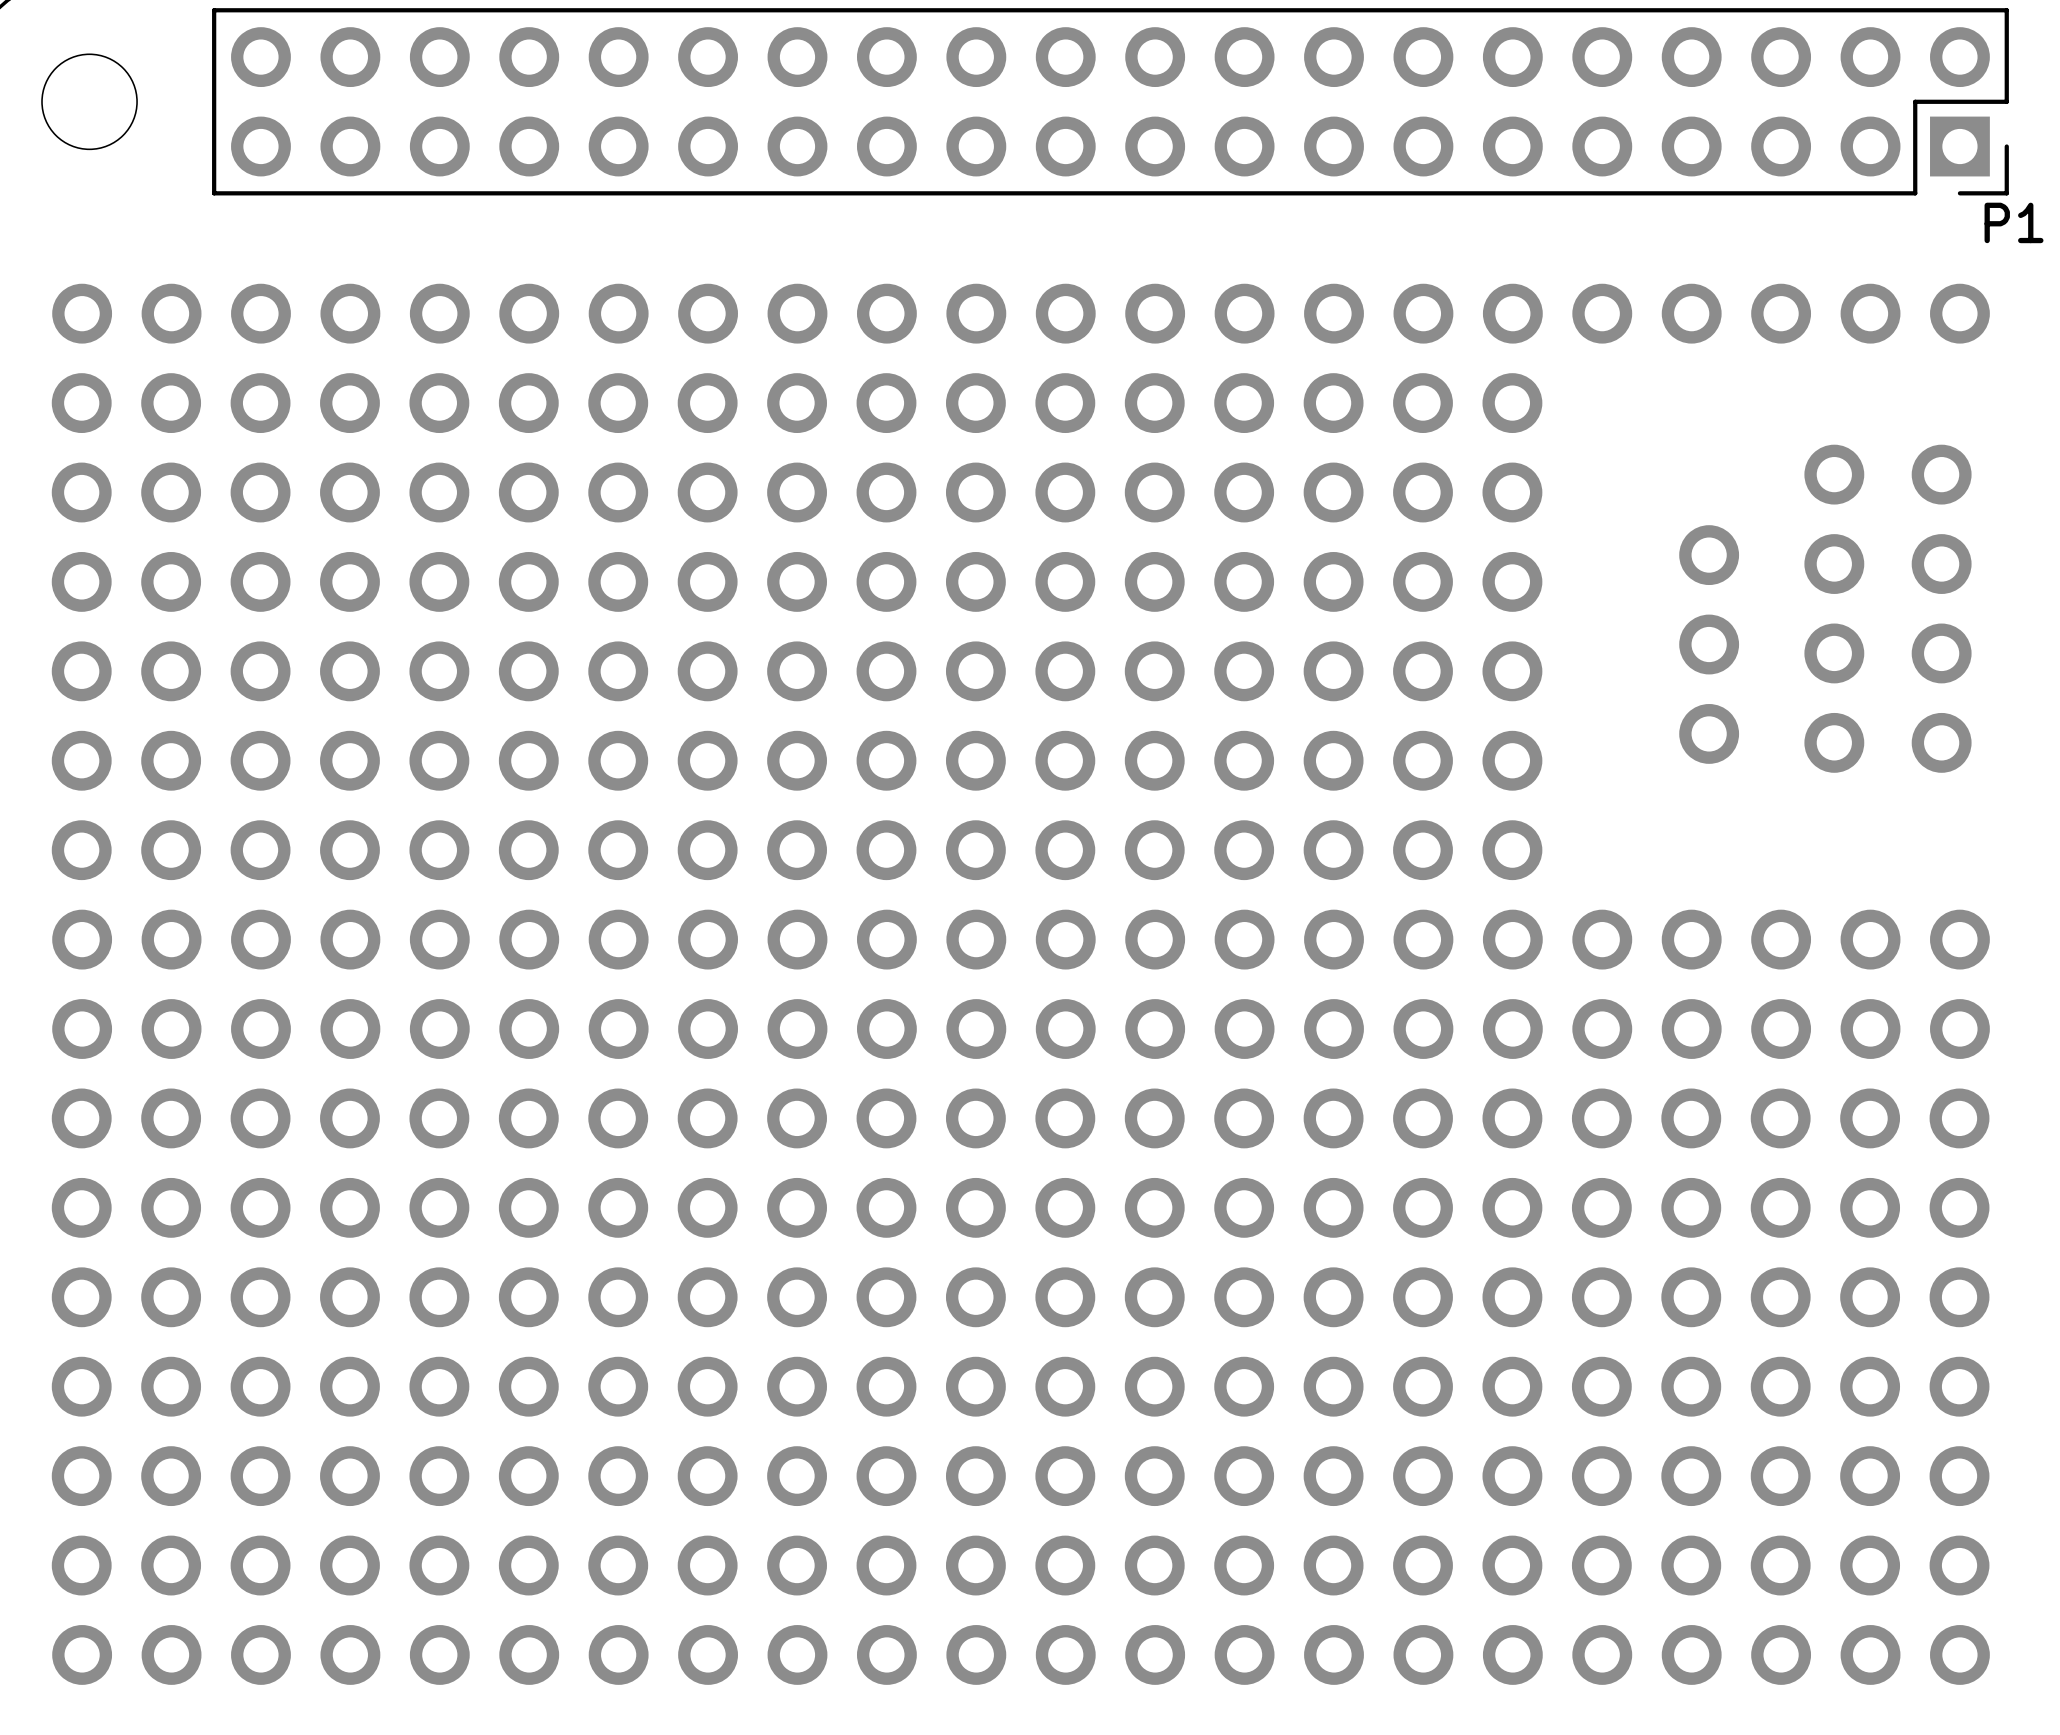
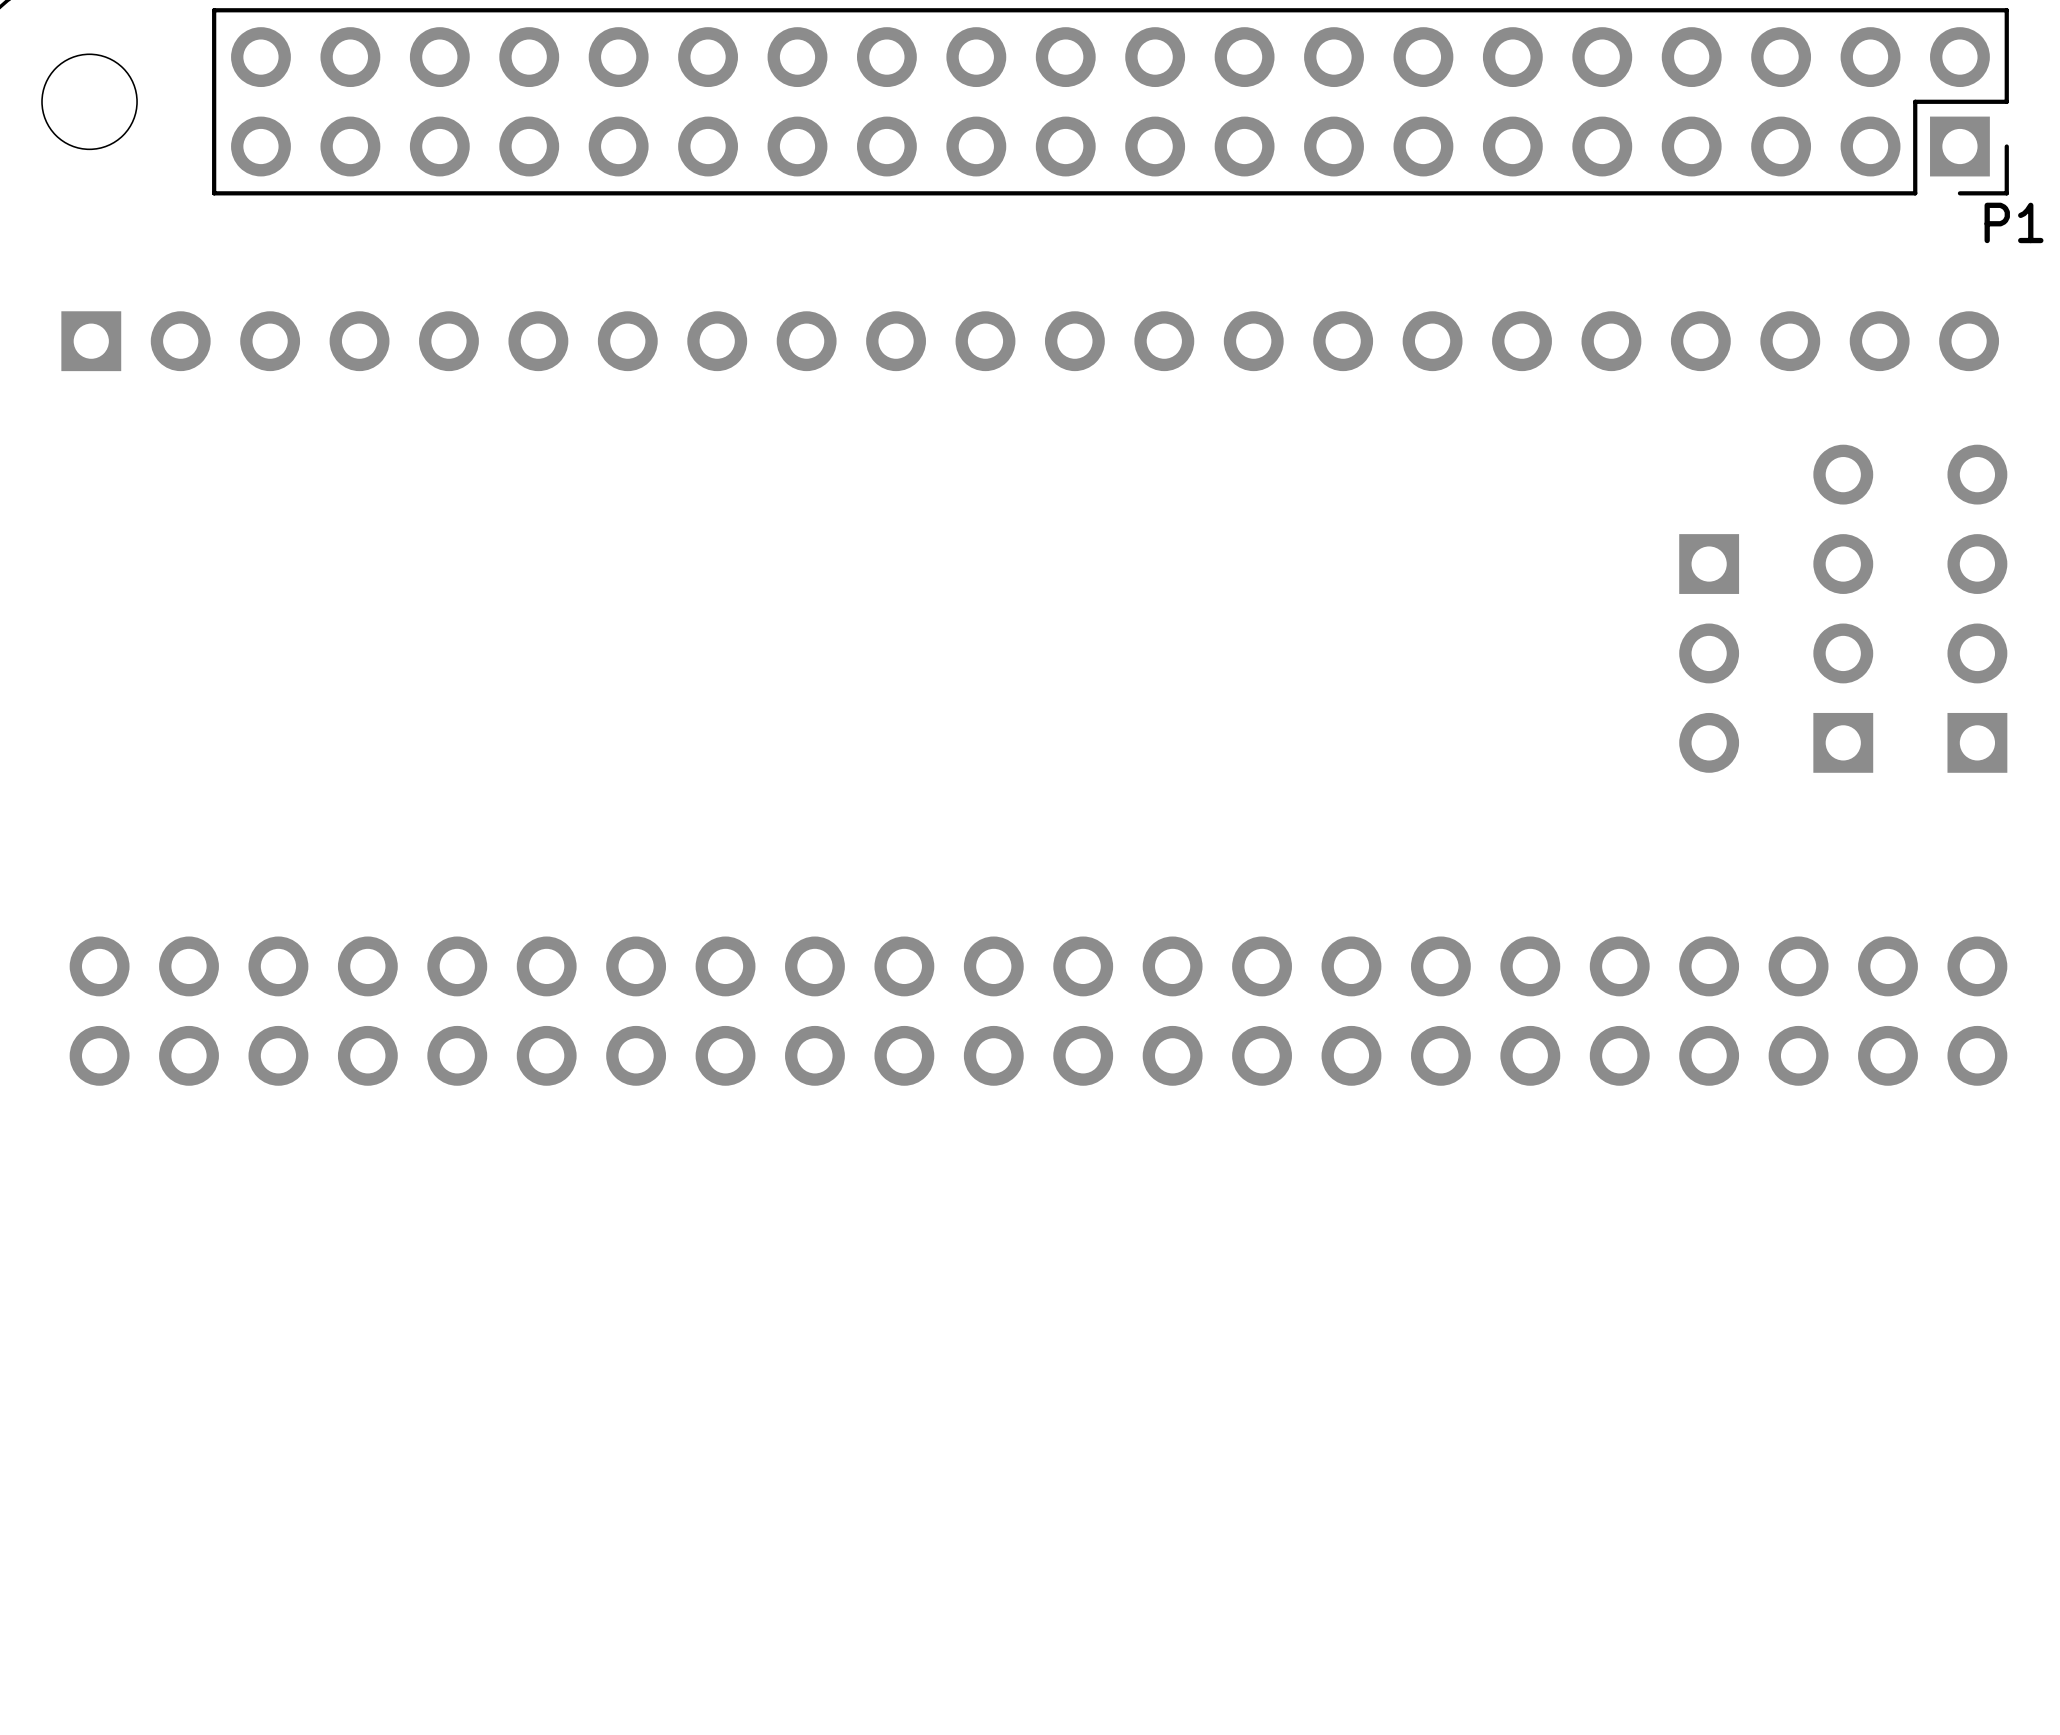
part footprint: [52, 283, 1990, 344] -> [61, 311, 2000, 372]
part footprint: [1804, 444, 1865, 773] -> [1813, 444, 1874, 773]
part footprint: [1679, 525, 1740, 764] -> [1679, 534, 1740, 773]
part: (1941, 608) -> none
part: none -> (1977, 608)
part: (797, 626) -> none
part position: (1021, 984) -> (1038, 1011)
part: (1020, 1341) -> none
part: (1021, 1654) -> none

